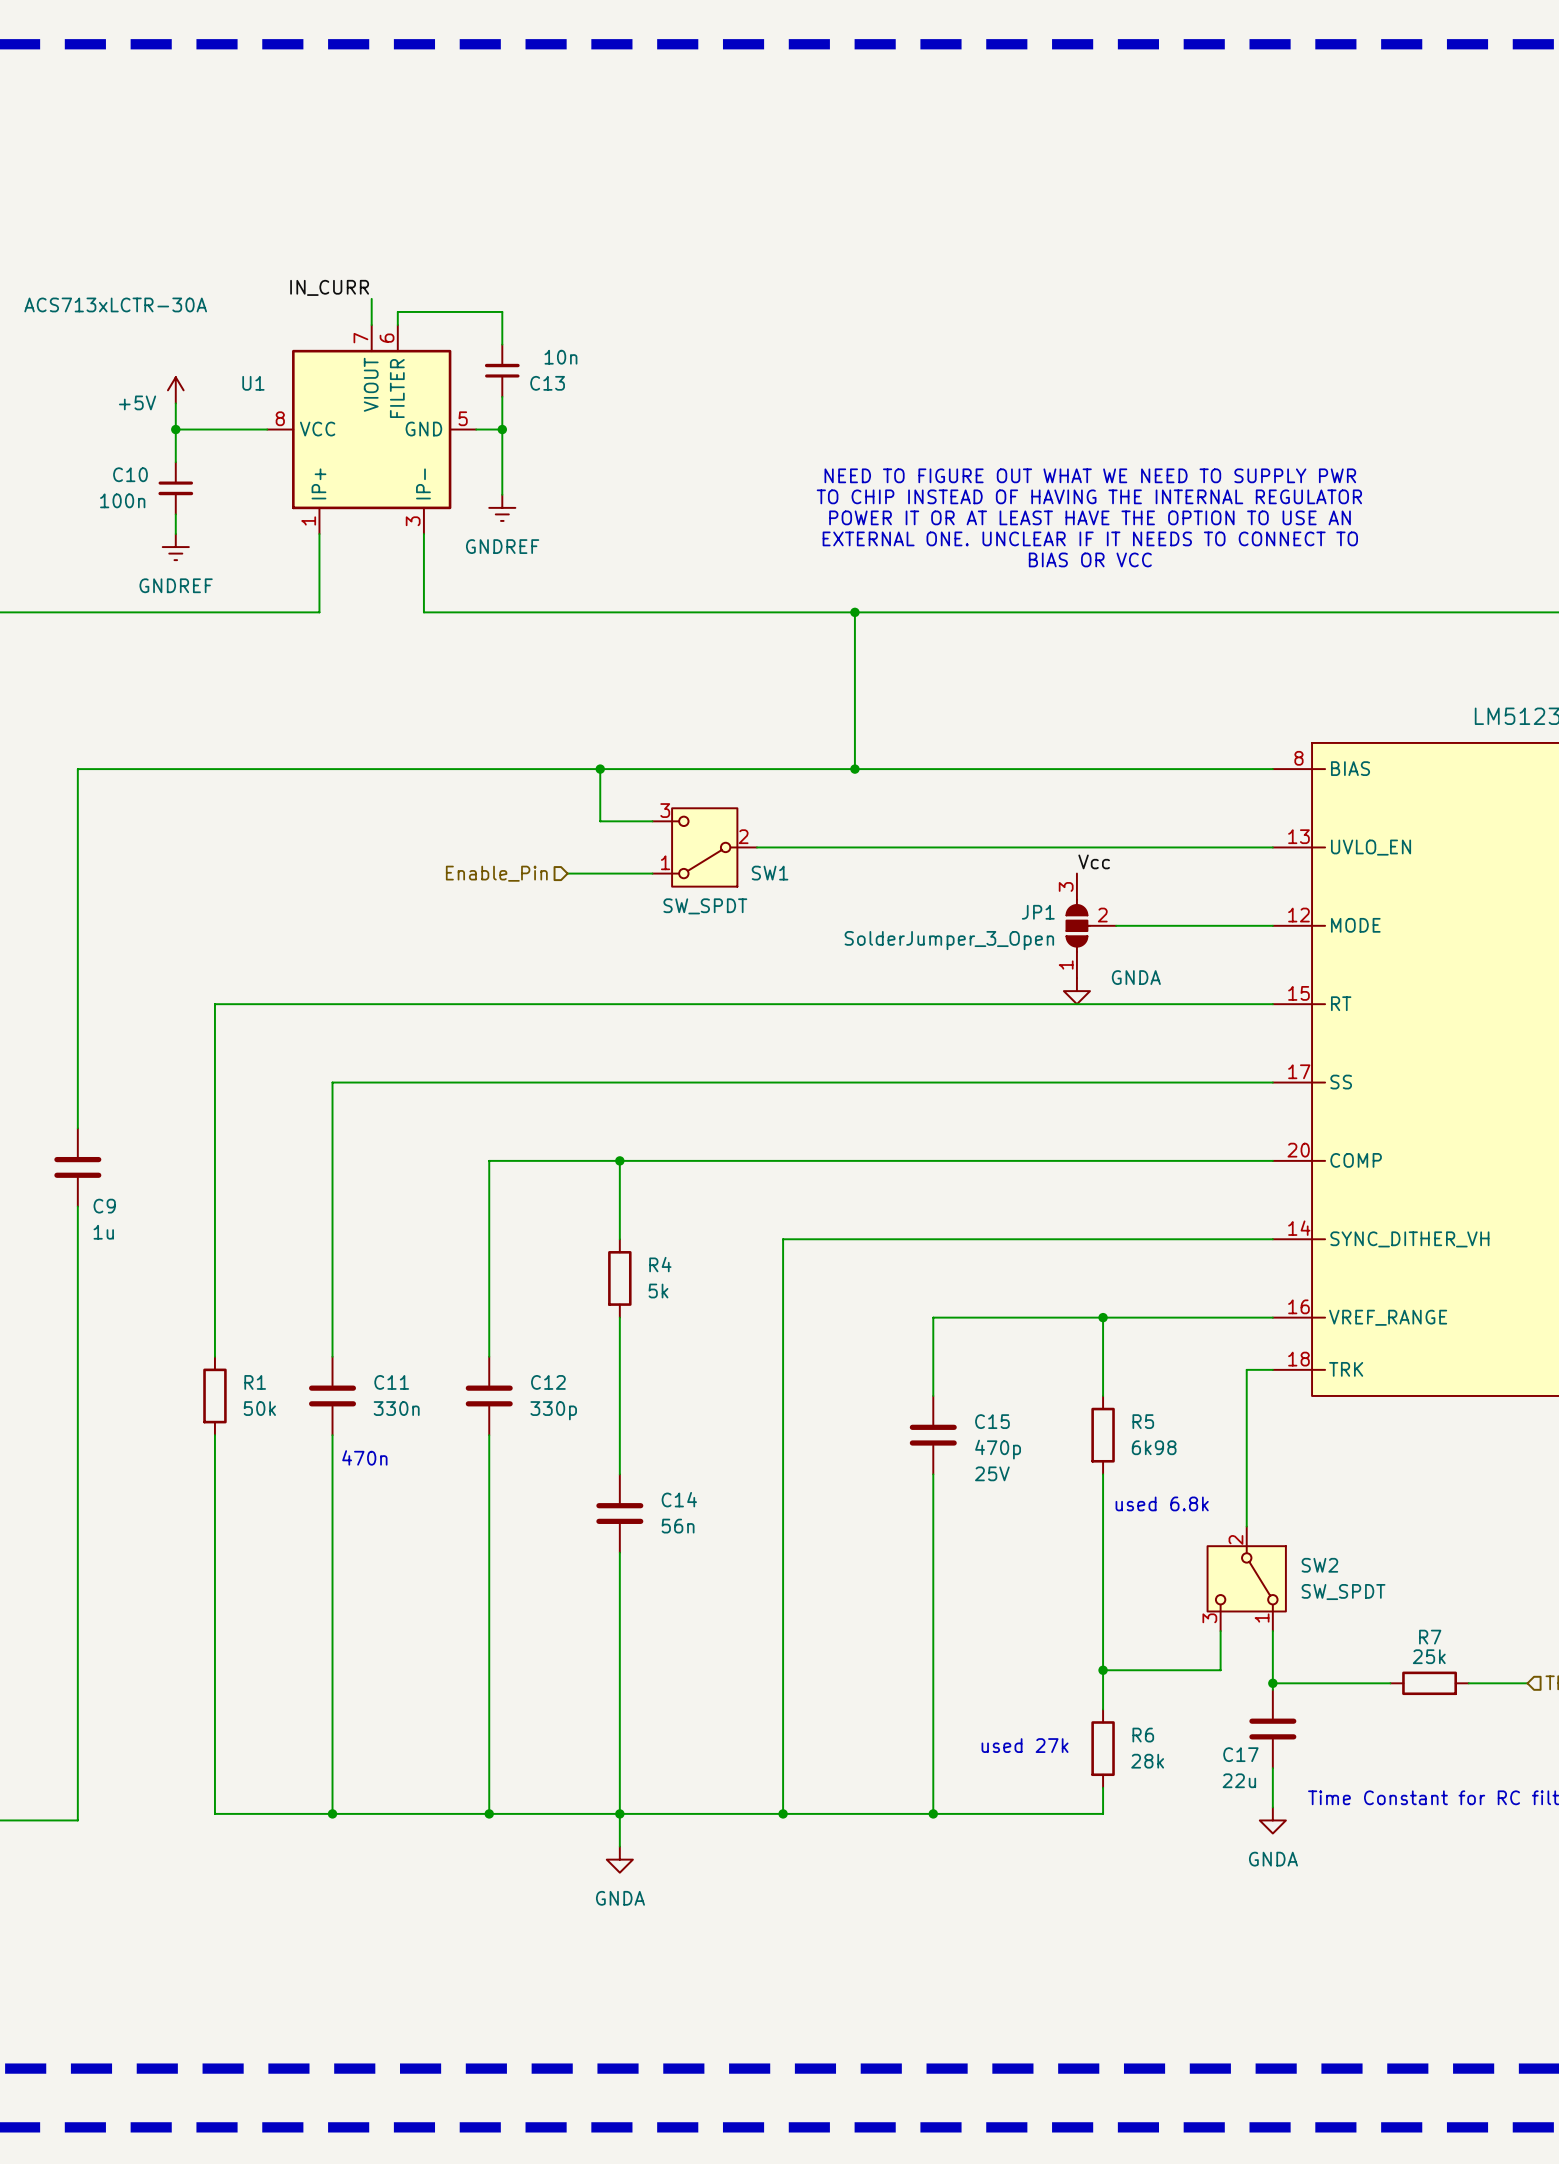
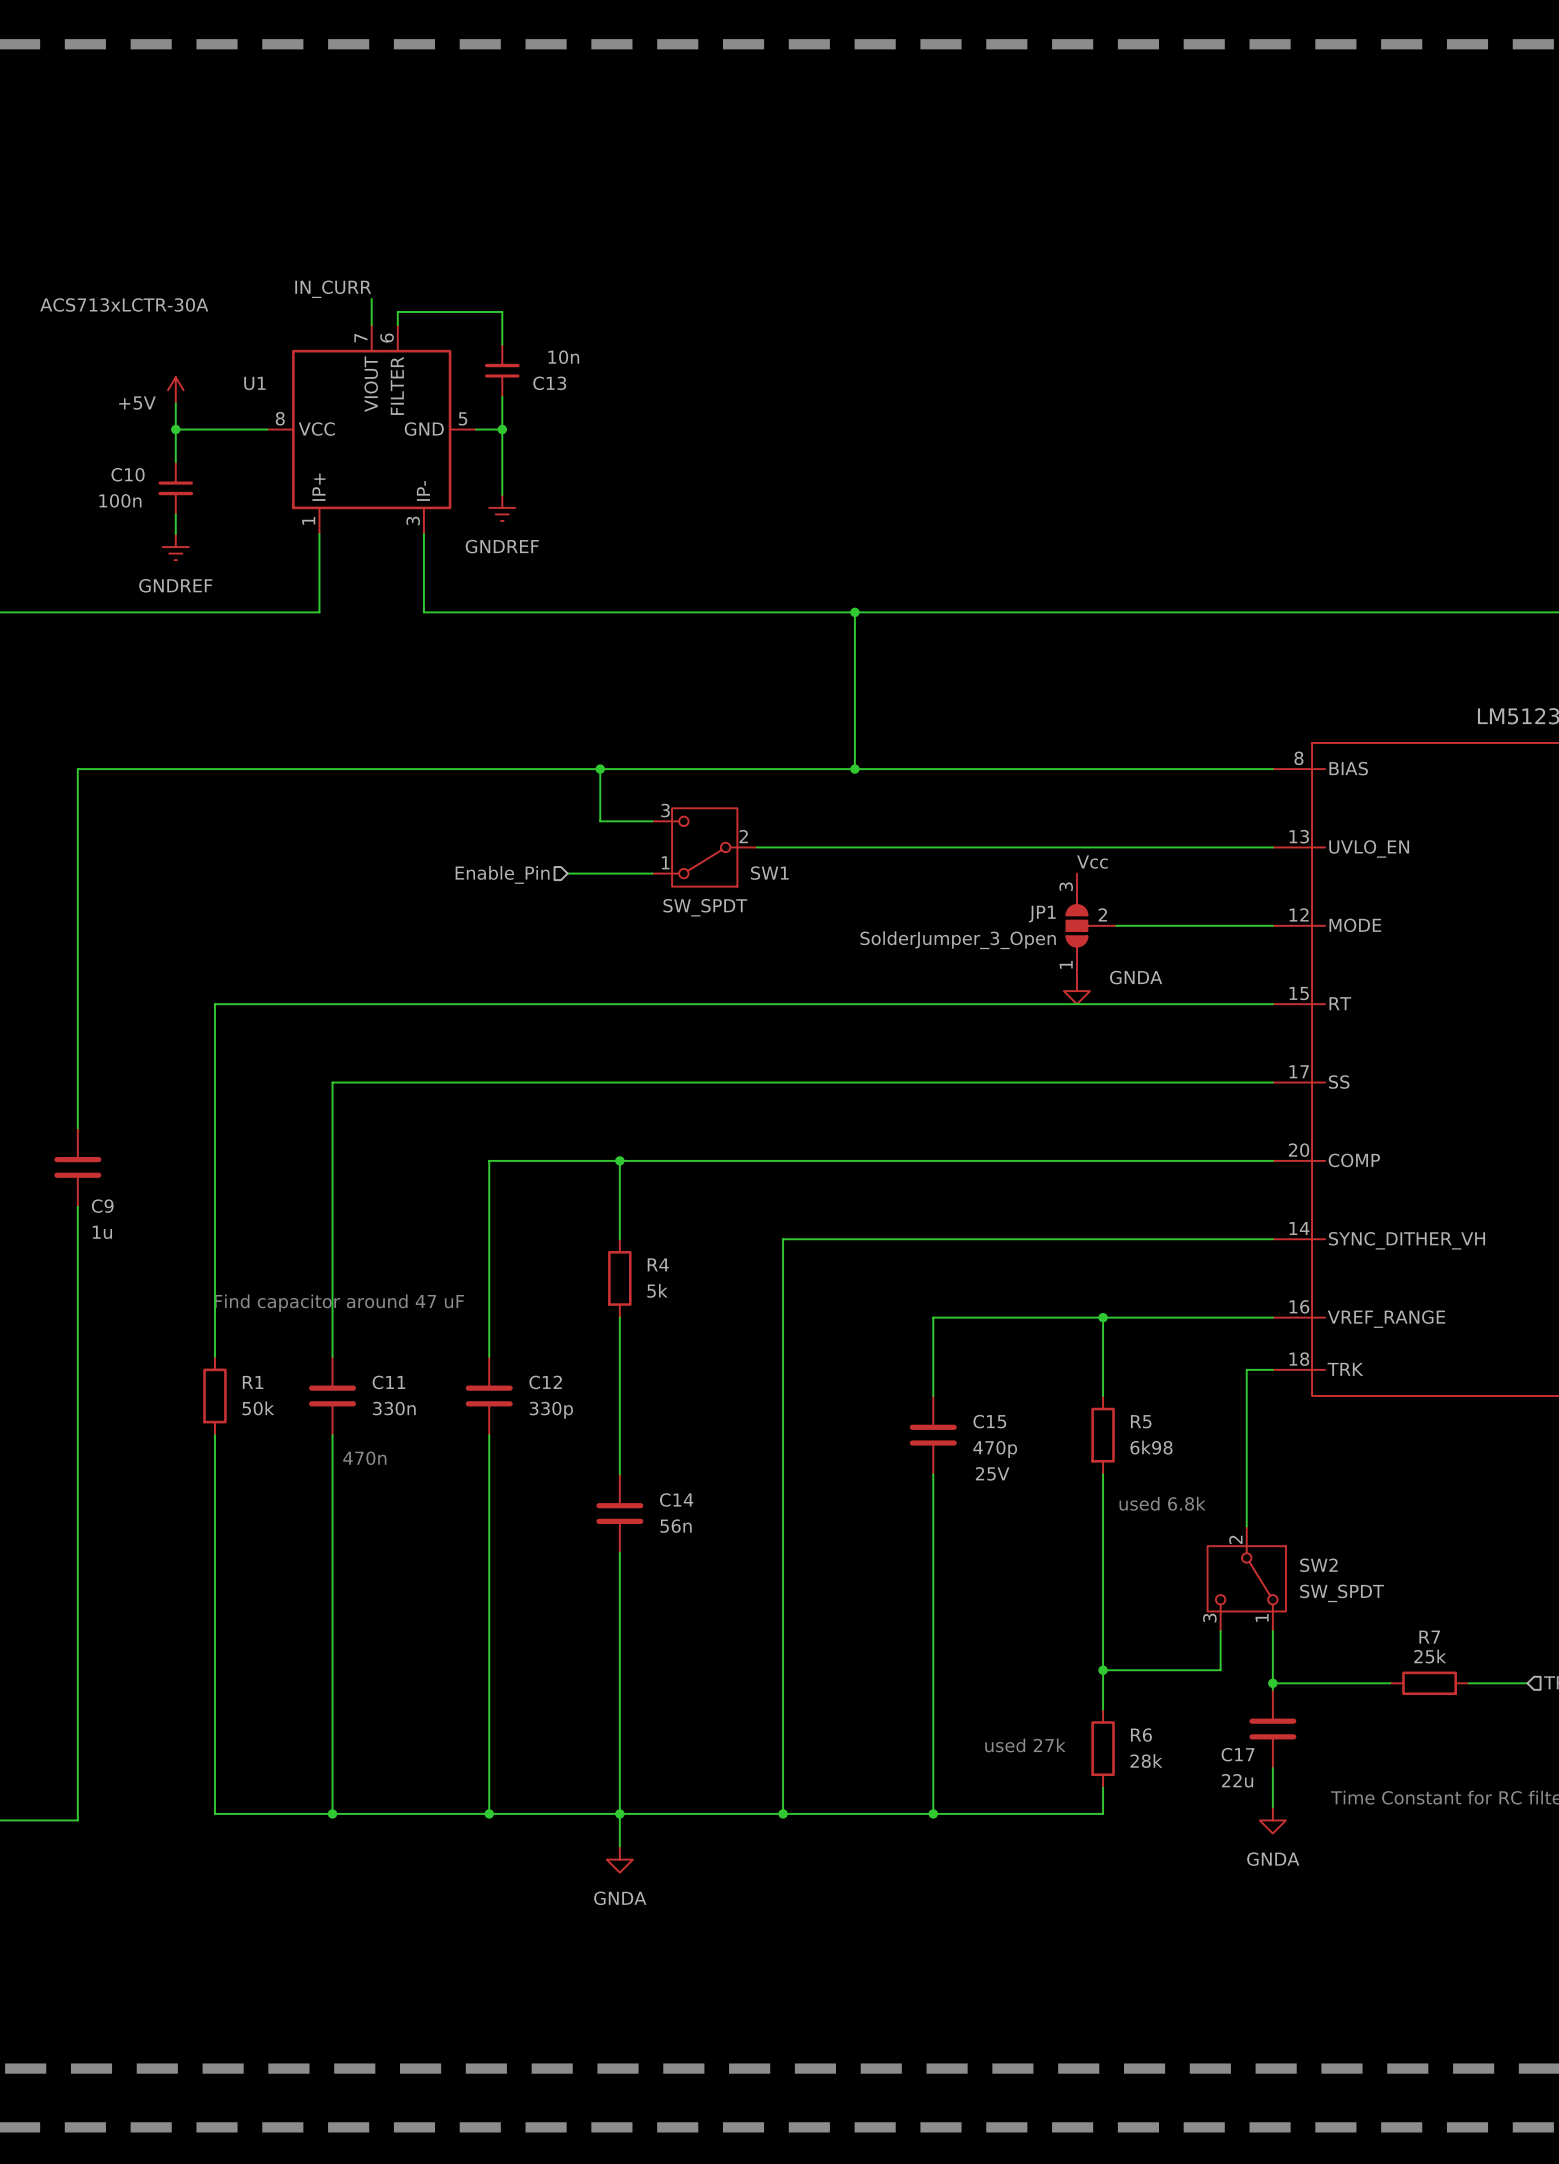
text: NEED TO FIGURE OUT WHAT WE NEED TO SUPPLY PWR (1090, 475) -> none
text: TO CHIP INSTEAD OF HAVING THE INTERNAL REGULATOR (1089, 496) -> none
text: POWER IT OR AT LEAST HAVE THE OPTION TO USE AN (1090, 517) -> none
text: EXTERNAL ONE. UNCLEAR IF IT NEEDS TO CONNECT TO (1090, 538) -> none
text: BIAS OR VCC (1090, 559) -> none
text: none -> Find capacitor around 47 uF (339, 1303)

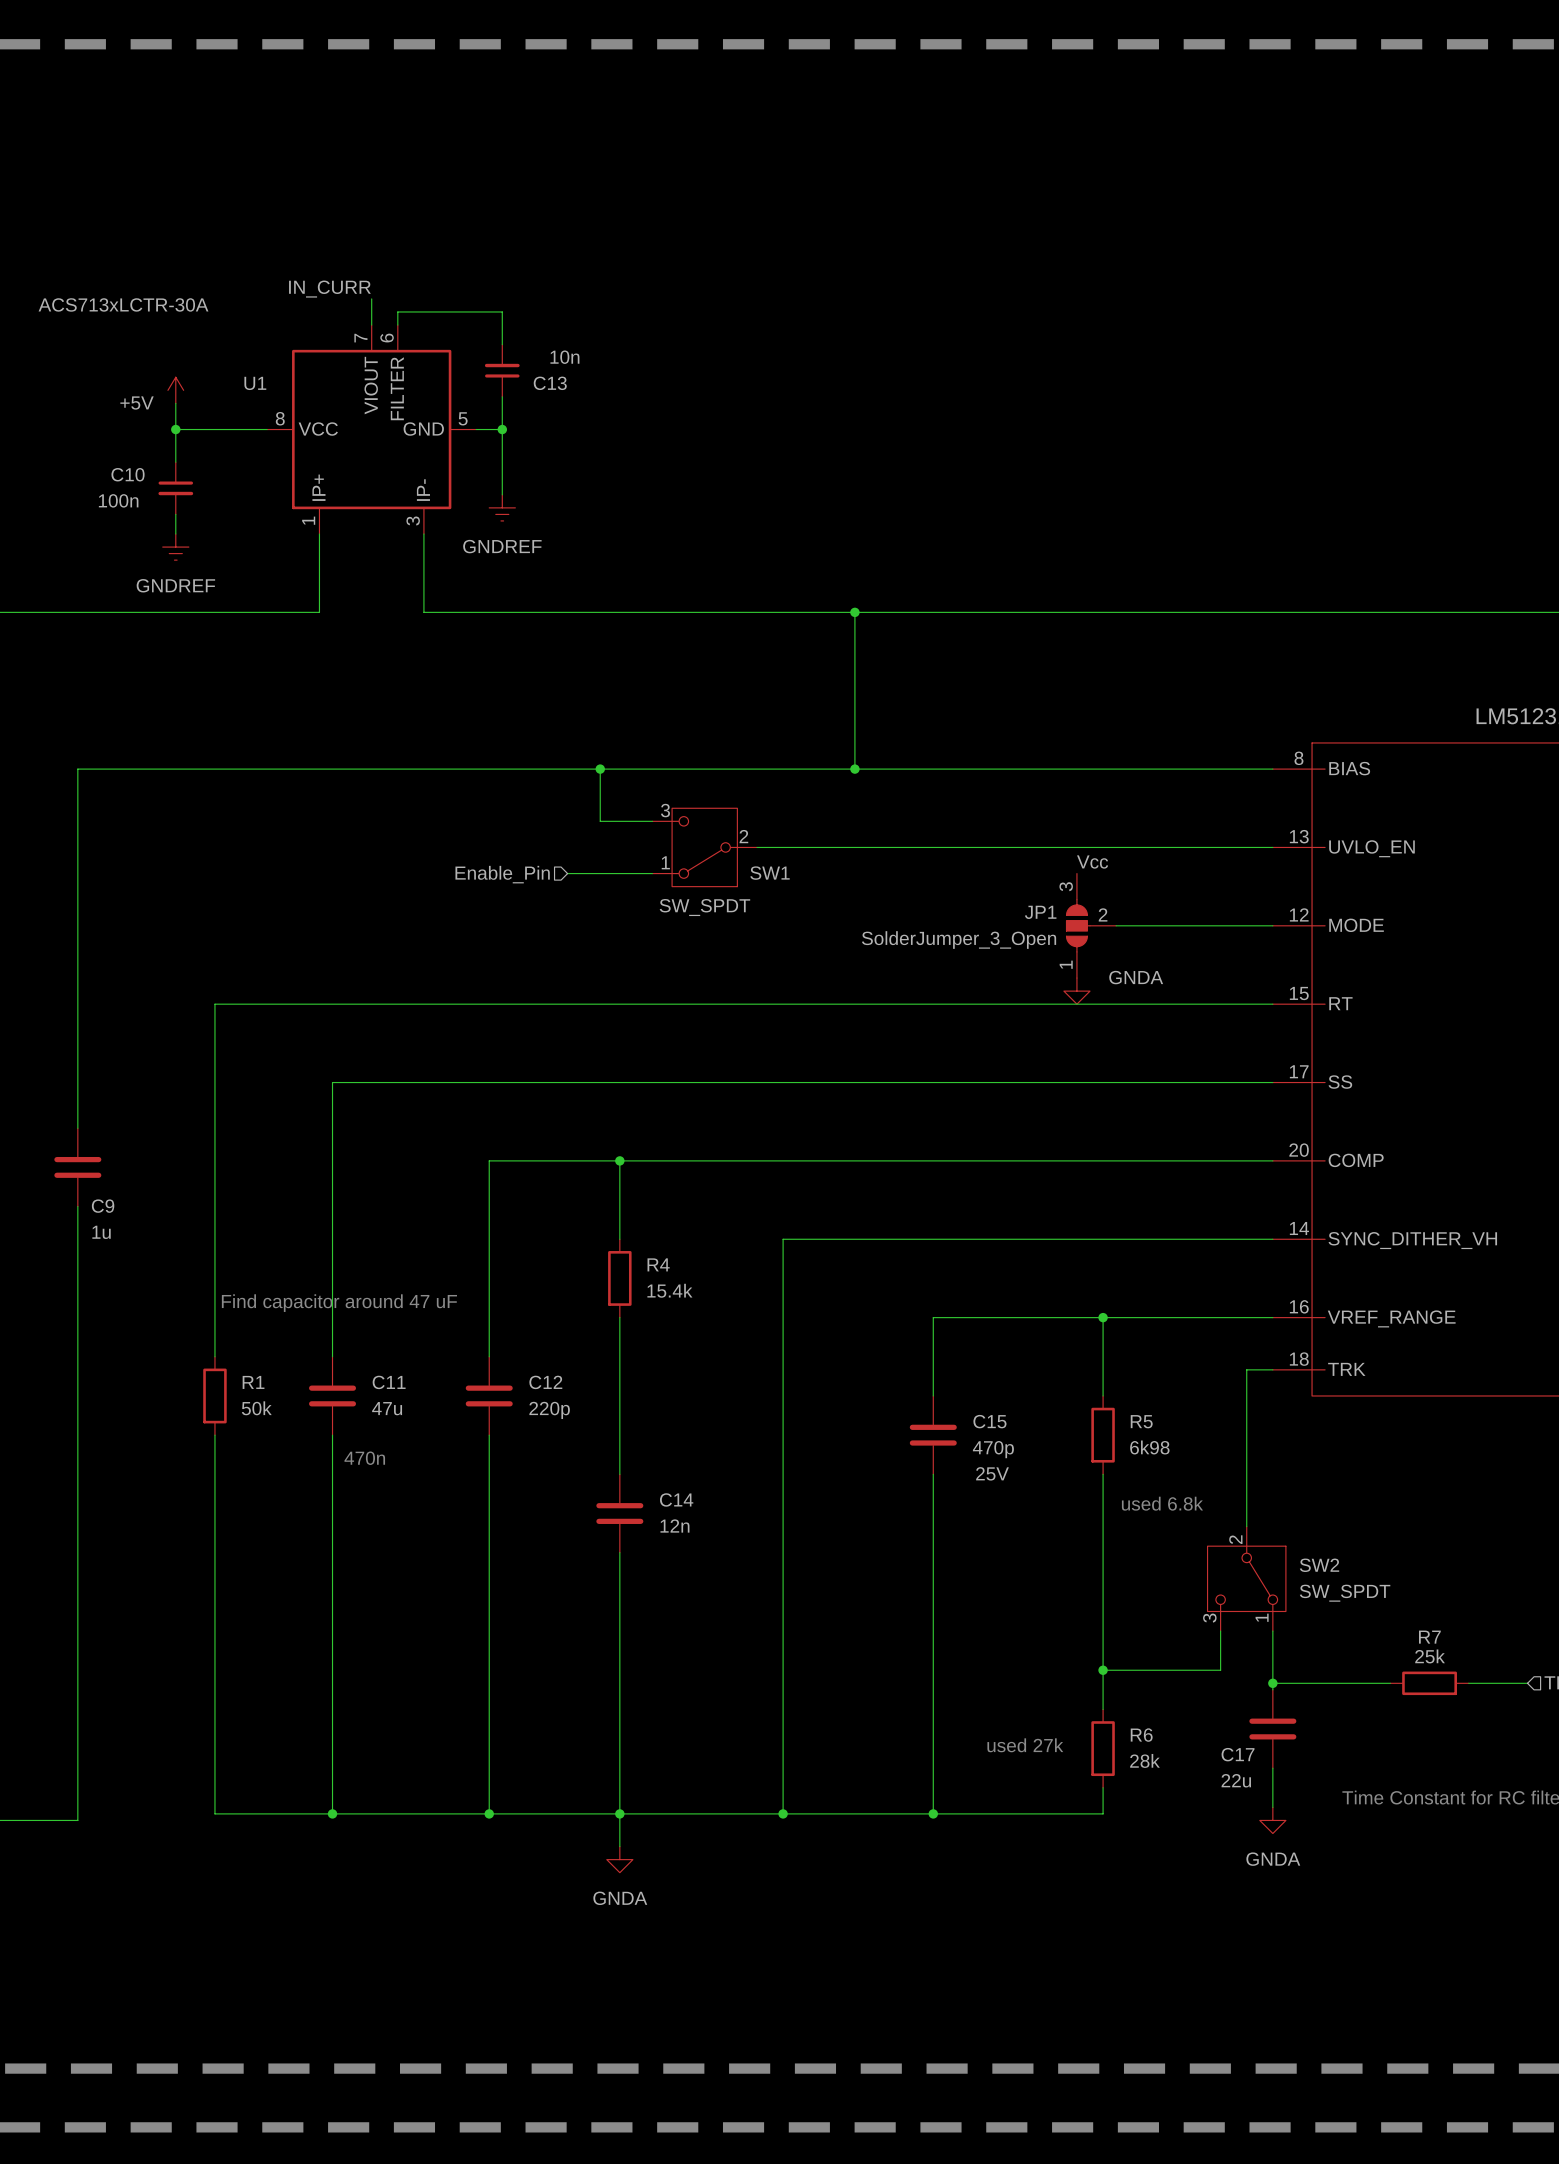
R4 value: 5k (657, 1290) -> 15.4k (669, 1290)
C11 value: 330n (394, 1408) -> 47u (387, 1408)
C12 value: 330p (551, 1410) -> 220p (549, 1410)
C14 value: 56n (676, 1526) -> 12n (674, 1526)

